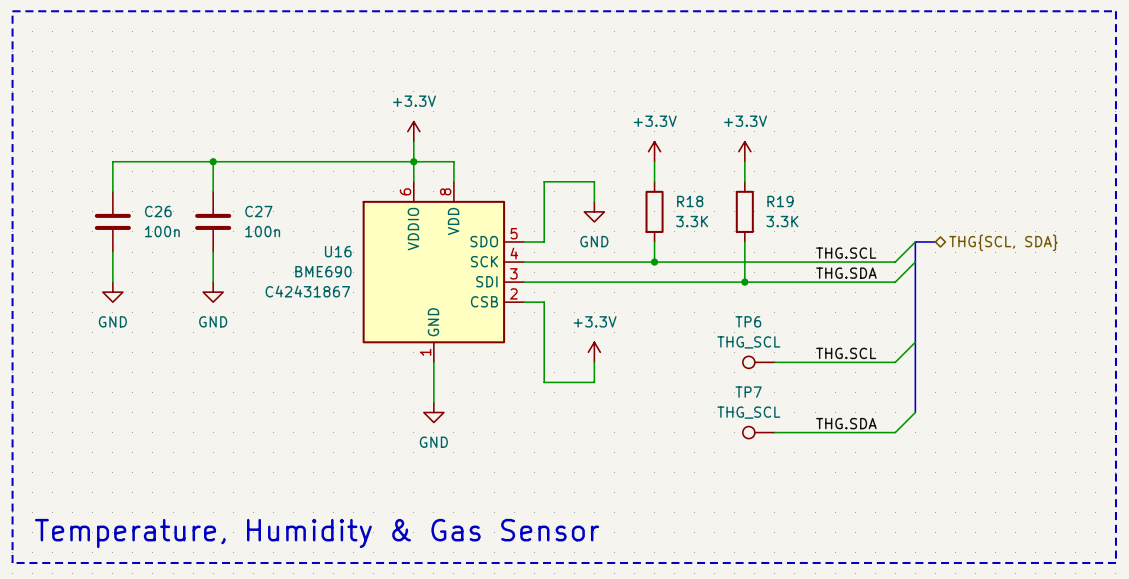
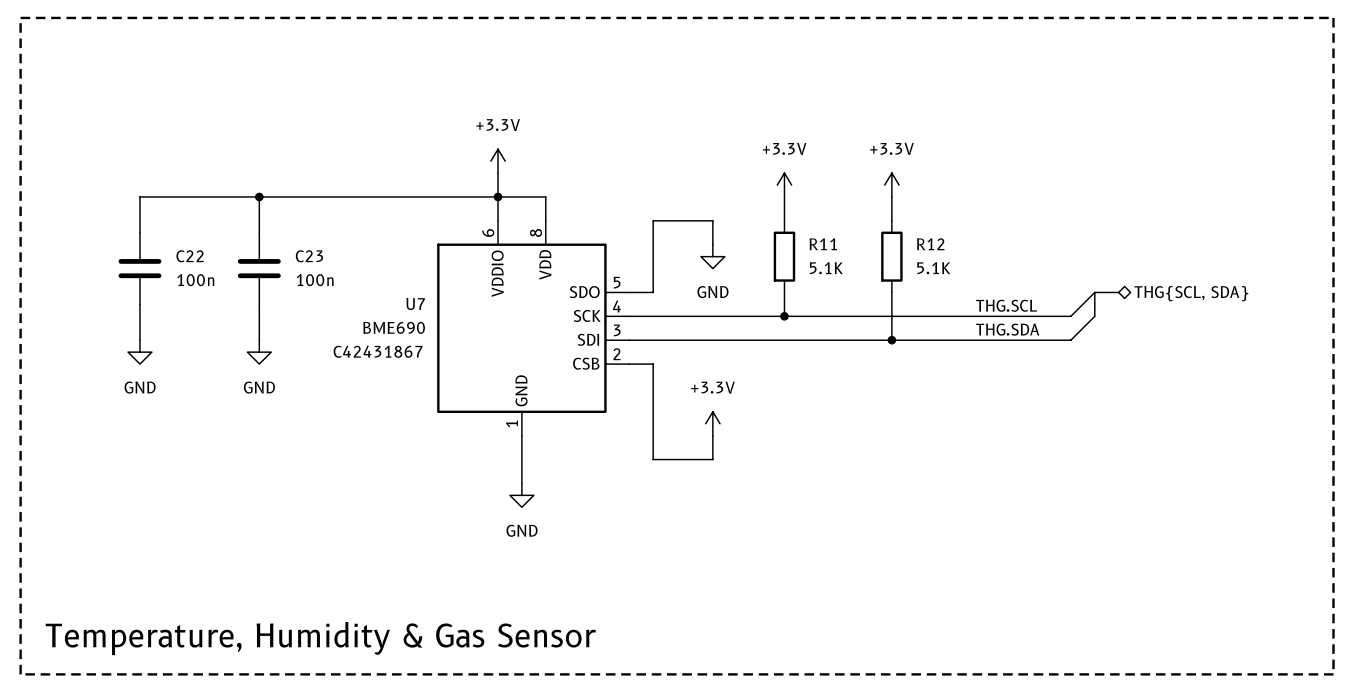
R18 name: R18 (690, 201) -> R11 (823, 244)
R19 name: R19 (780, 201) -> R12 (930, 244)
C26 name: C26 (158, 211) -> C22 (190, 256)
C27 name: C27 (258, 211) -> C23 (309, 256)
R18 value: 3.3K (692, 221) -> 5.1K (826, 268)
R19 value: 3.3K (782, 221) -> 5.1K (933, 268)
U16 name: U16 (338, 251) -> U7 (415, 304)
bus: (915, 262) (915, 412) -> none
wire: (915, 342) (895, 362) (774, 362) -> none
label: THG.SCL (846, 353) -> none
TP6: THG_SCL (758, 362) -> none
wire: (915, 412) (895, 432) (774, 432) -> none
label: THG.SDA (846, 423) -> none
TP7: THG_SCL (758, 432) -> none

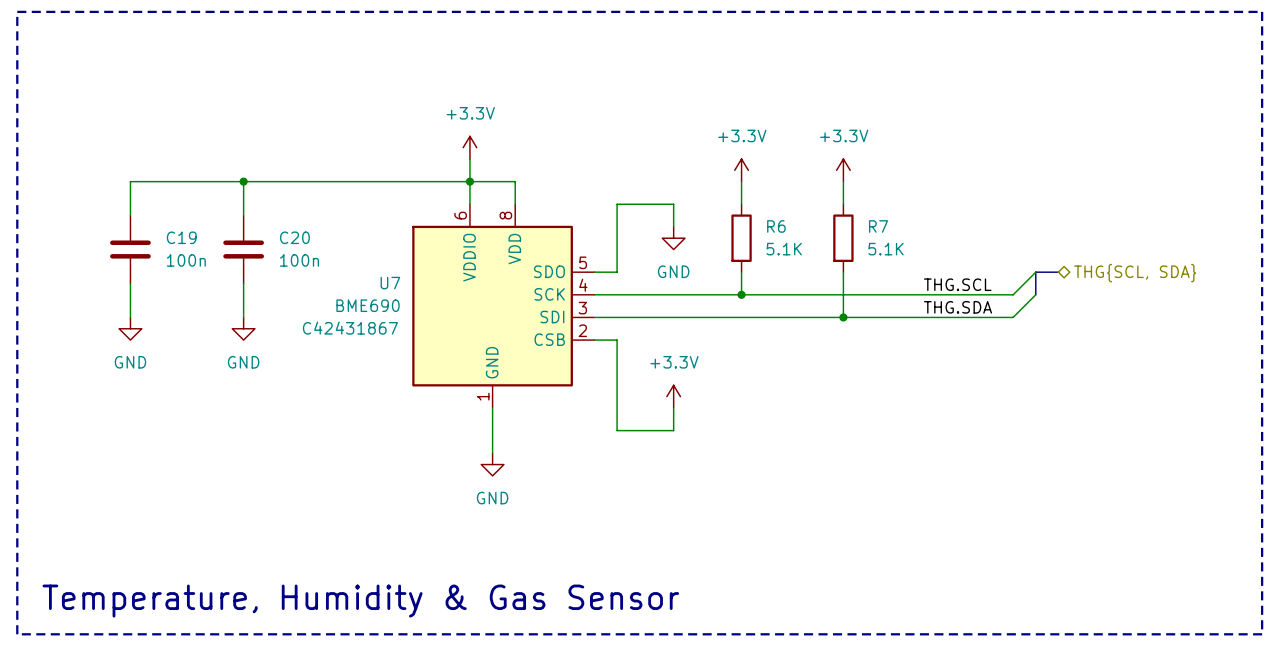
R11 name: R11 (823, 244) -> R6 (776, 226)
R12 name: R12 (930, 244) -> R7 (878, 226)
C22 name: C22 (190, 256) -> C19 (181, 237)
C23 name: C23 (309, 256) -> C20 (294, 237)

